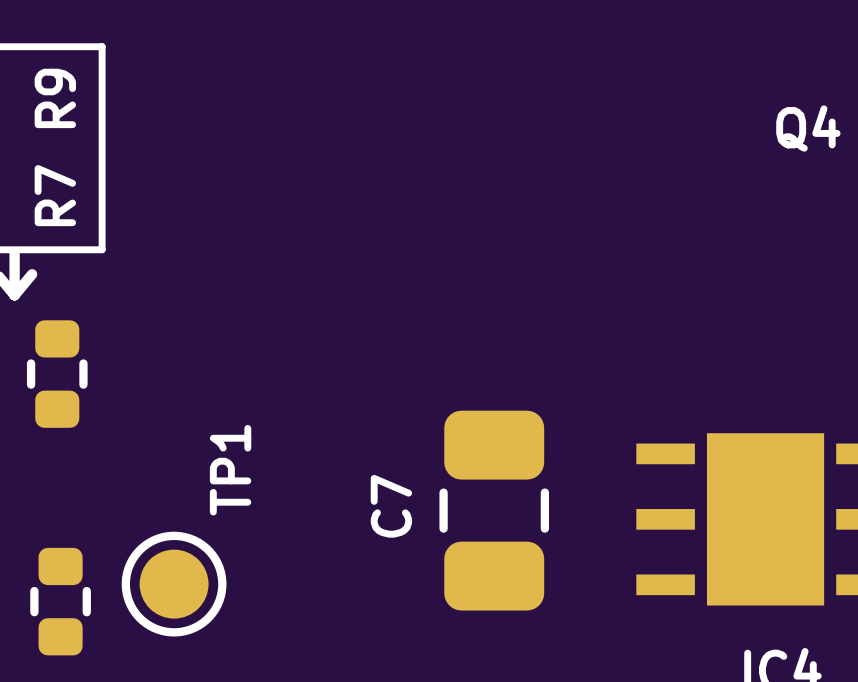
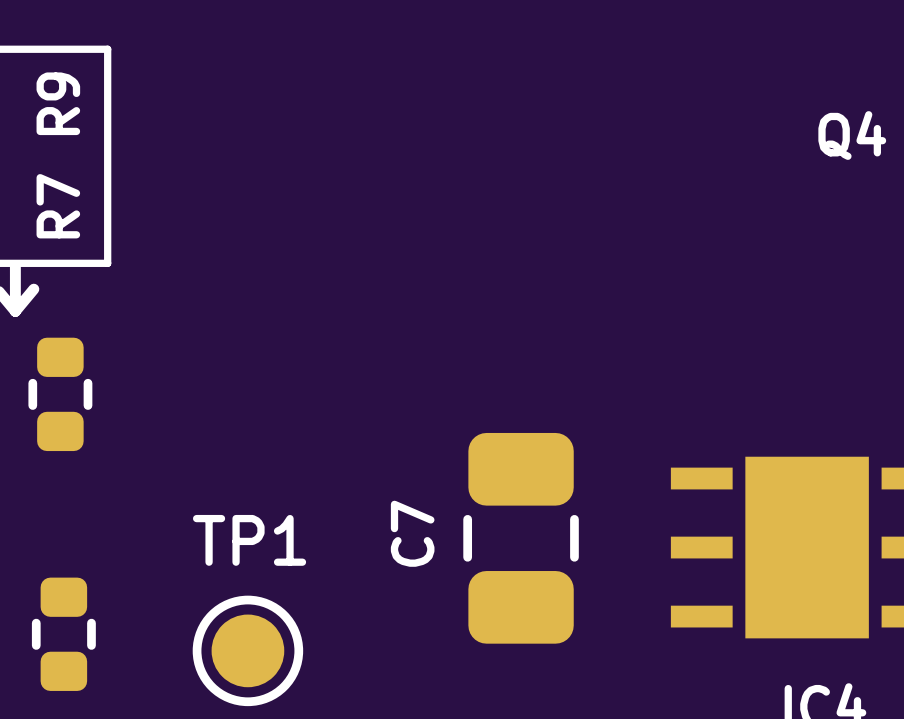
TP1 name rotation: 0° (230, 470) -> 90° clockwise (249, 540)
TP1 position: (174, 584) -> (247, 650)

